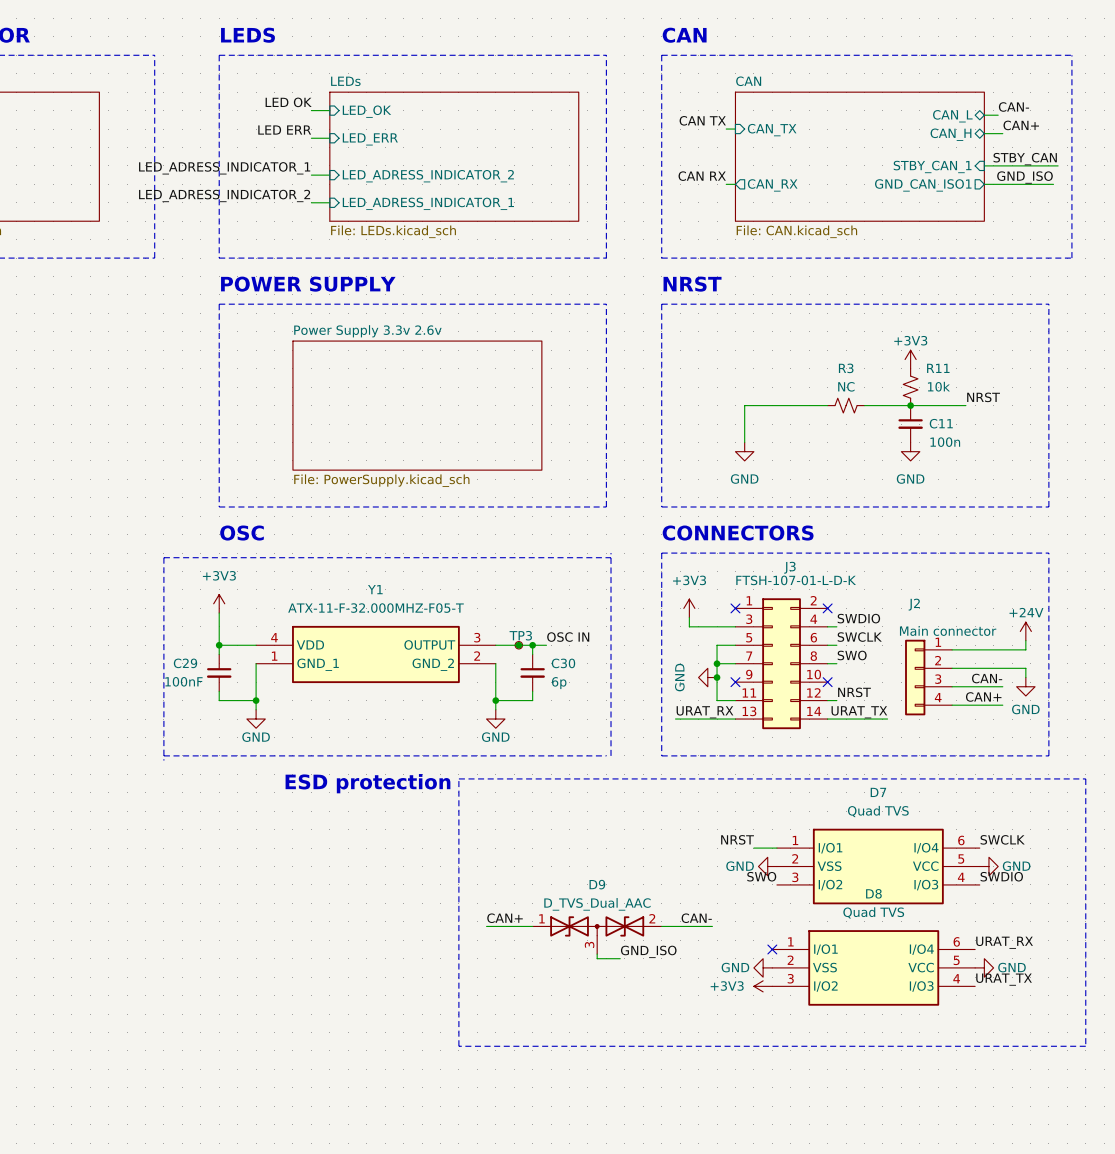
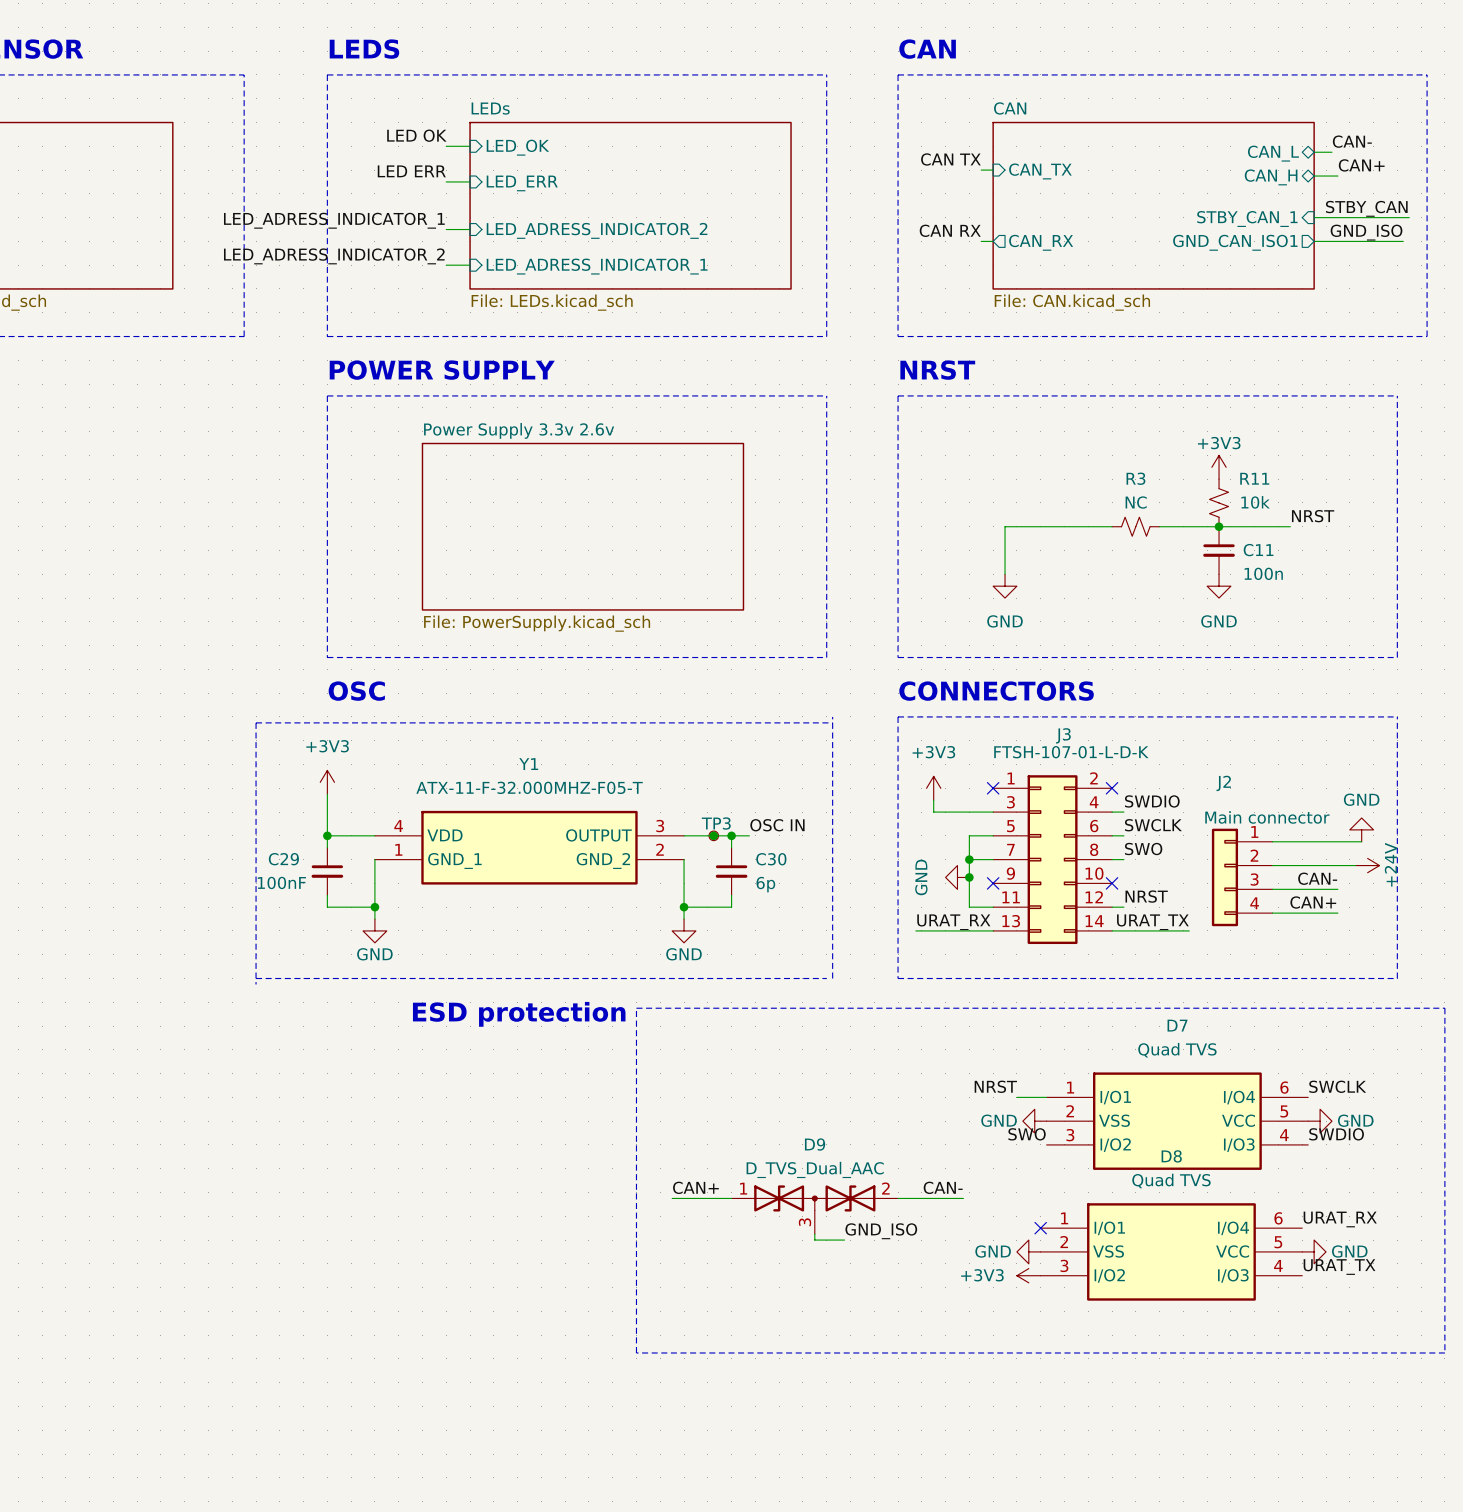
power symbol rotation: 0° (1025, 631) -> 90° clockwise (1367, 865)
power symbol position: +24V (1025, 631) -> +24V (1367, 865)
wire: (1025, 640) (1025, 649) (1021, 649) -> none
power symbol rotation: 0° (1025, 686) -> 180° (1361, 829)
power symbol position: GND (1025, 686) -> GND (1361, 829)

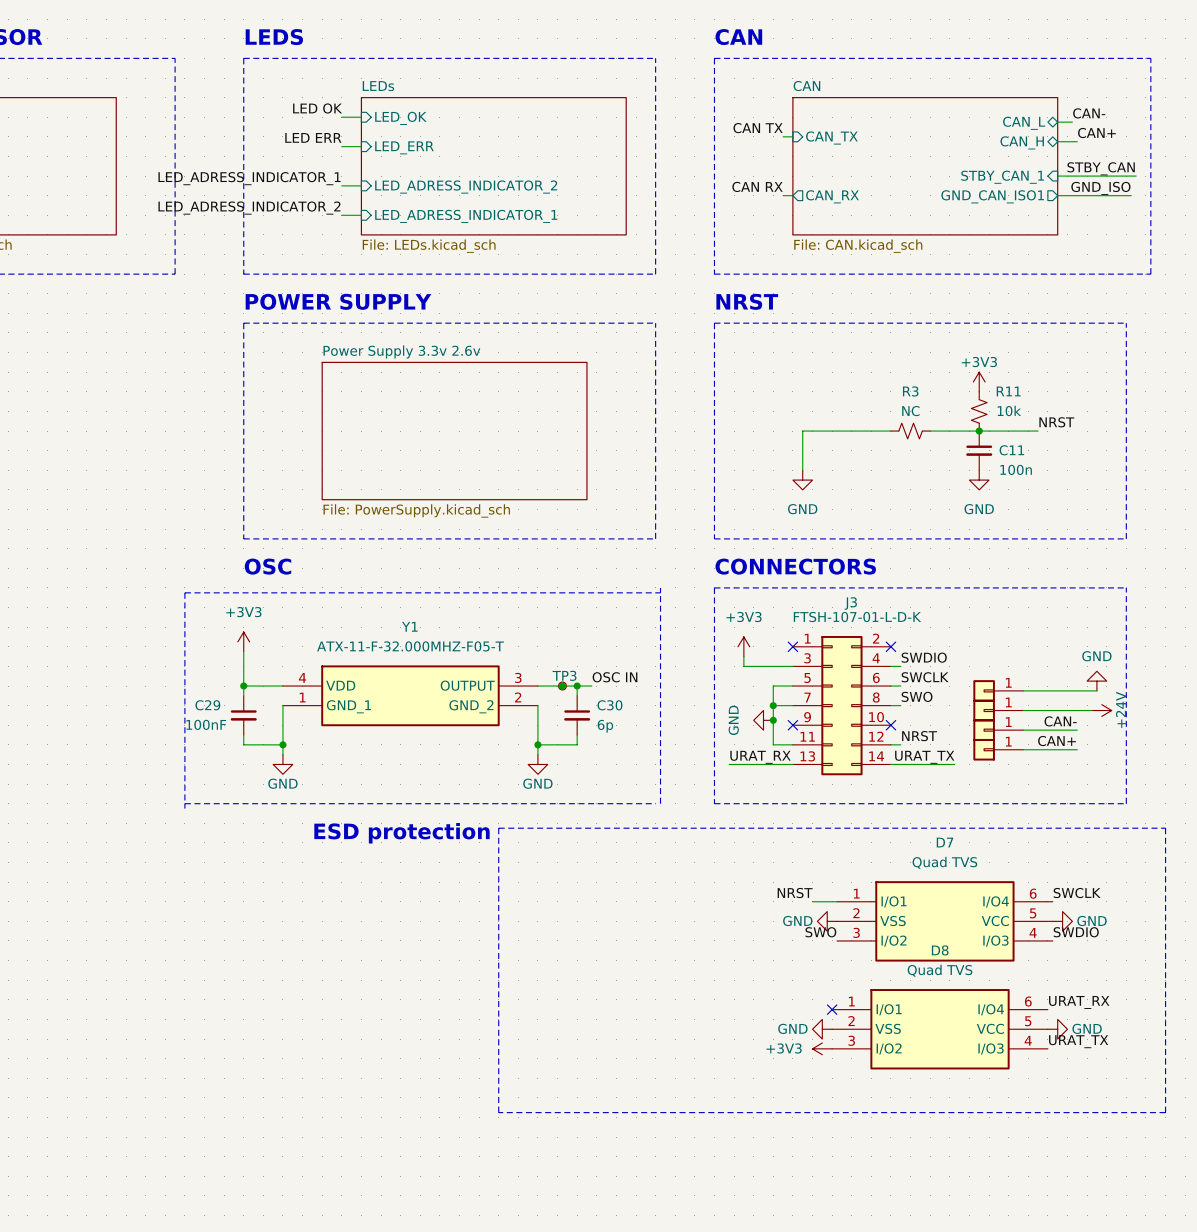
part: none -> (998, 690)
part: none -> (998, 710)
J2: Main connector (1242, 877) -> none
part: none -> (998, 730)
part: none -> (998, 749)
label: CAN+ (695, 1187) -> none
label: CAN- (943, 1187) -> none
wire: (672, 1198) (731, 1198) -> none
wire: (898, 1198) (963, 1198) -> none
D9: D_TVS_Dual_AAC (814, 1209) -> none
label: GND_ISO (881, 1231) -> none
wire: (814, 1234) (814, 1240) (844, 1240) -> none

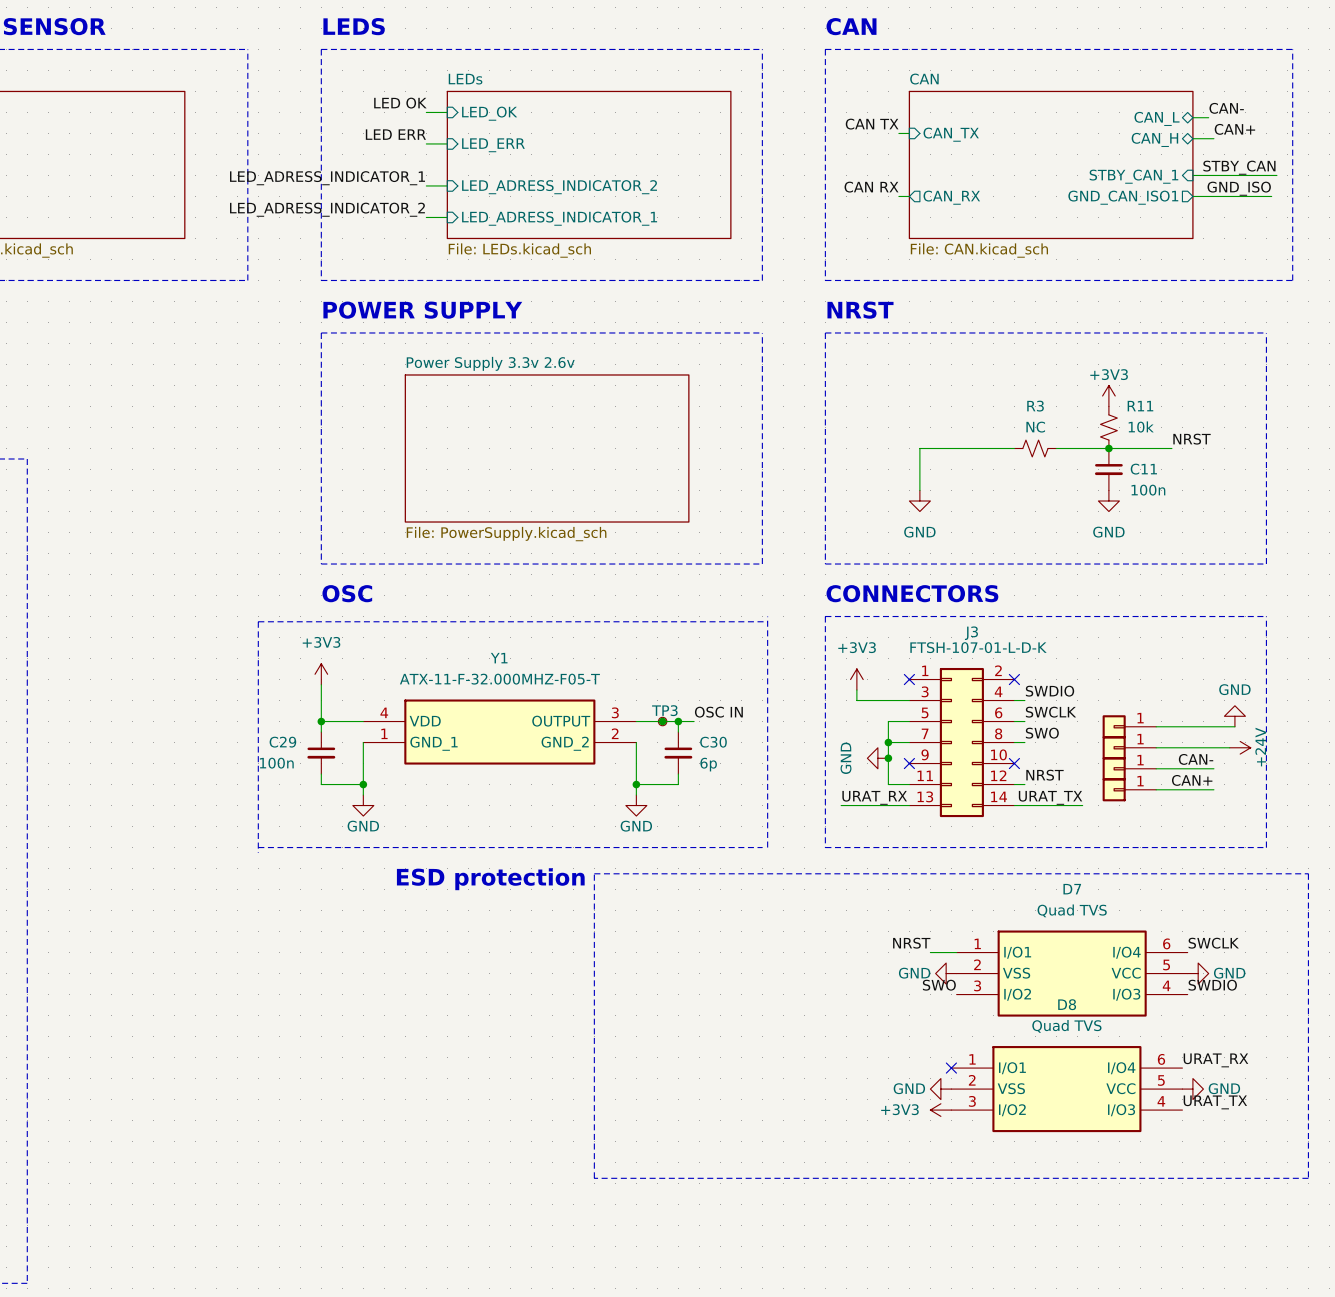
C29 value: 100nF (206, 724) -> 100n (276, 763)

